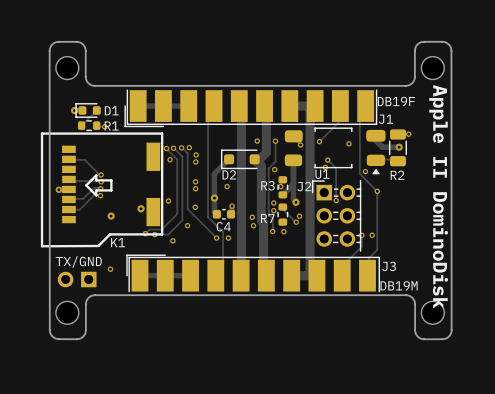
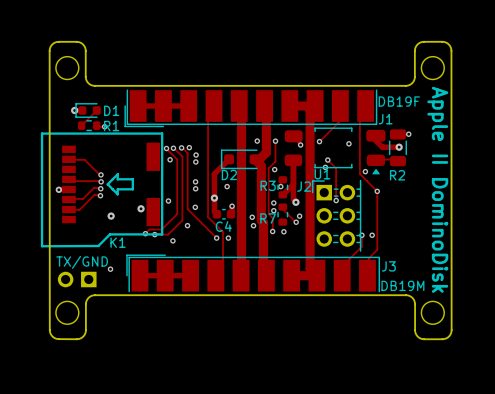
K1 footprint: [40, 132, 164, 248] -> [40, 132, 164, 248]

